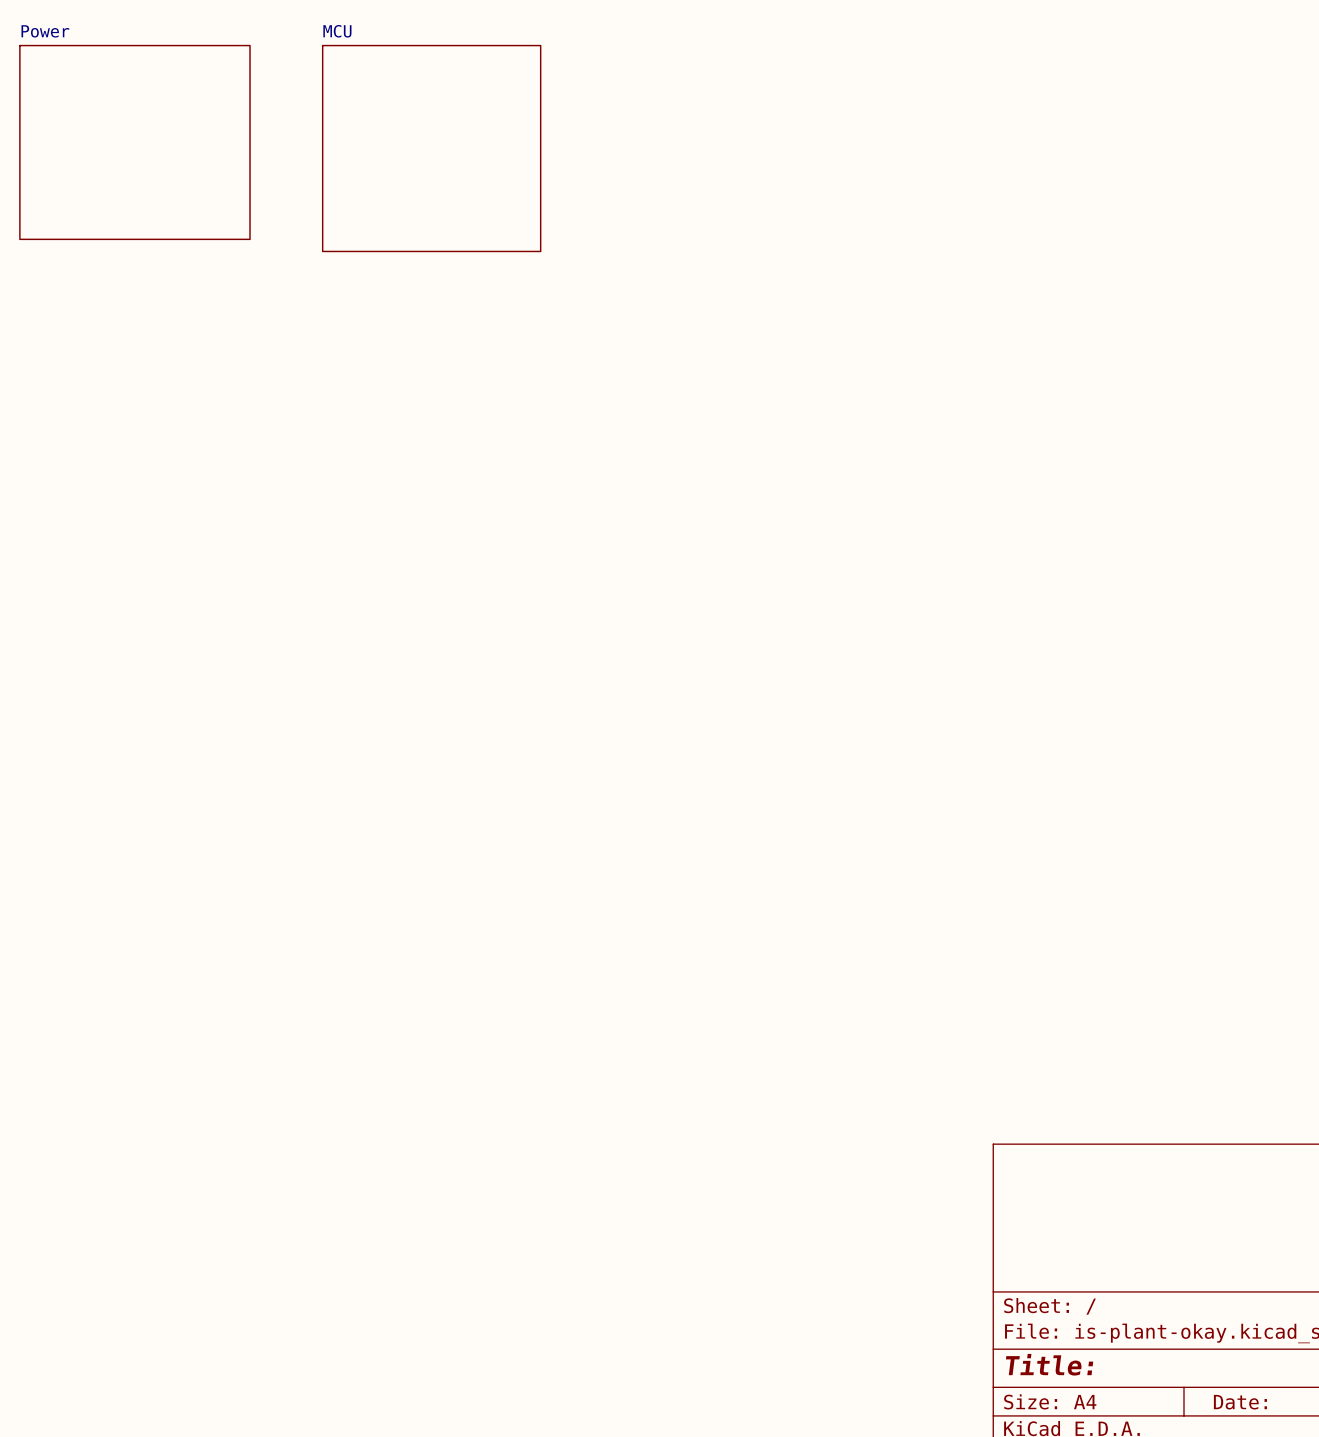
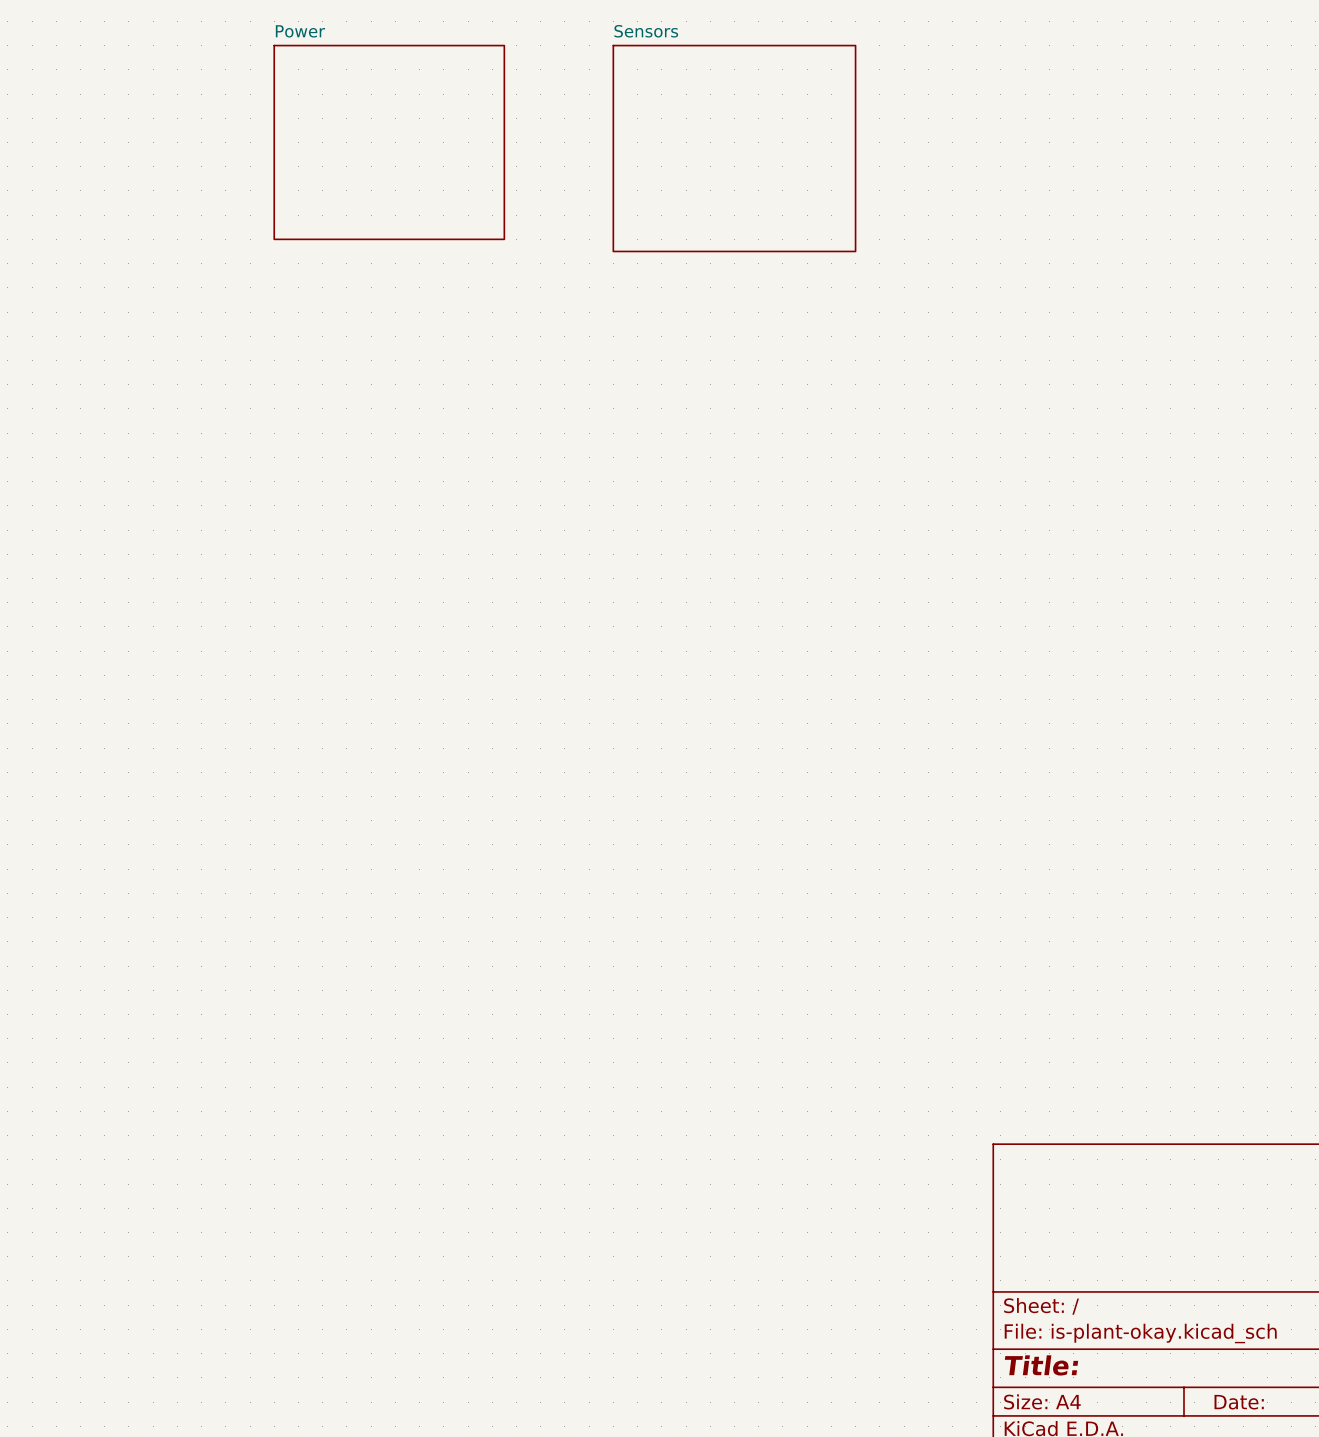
sheet Power: (134, 142) -> none
sheet Power: none -> (389, 142)
sheet MCU: (431, 148) -> none
sheet Sensors: none -> (734, 148)

